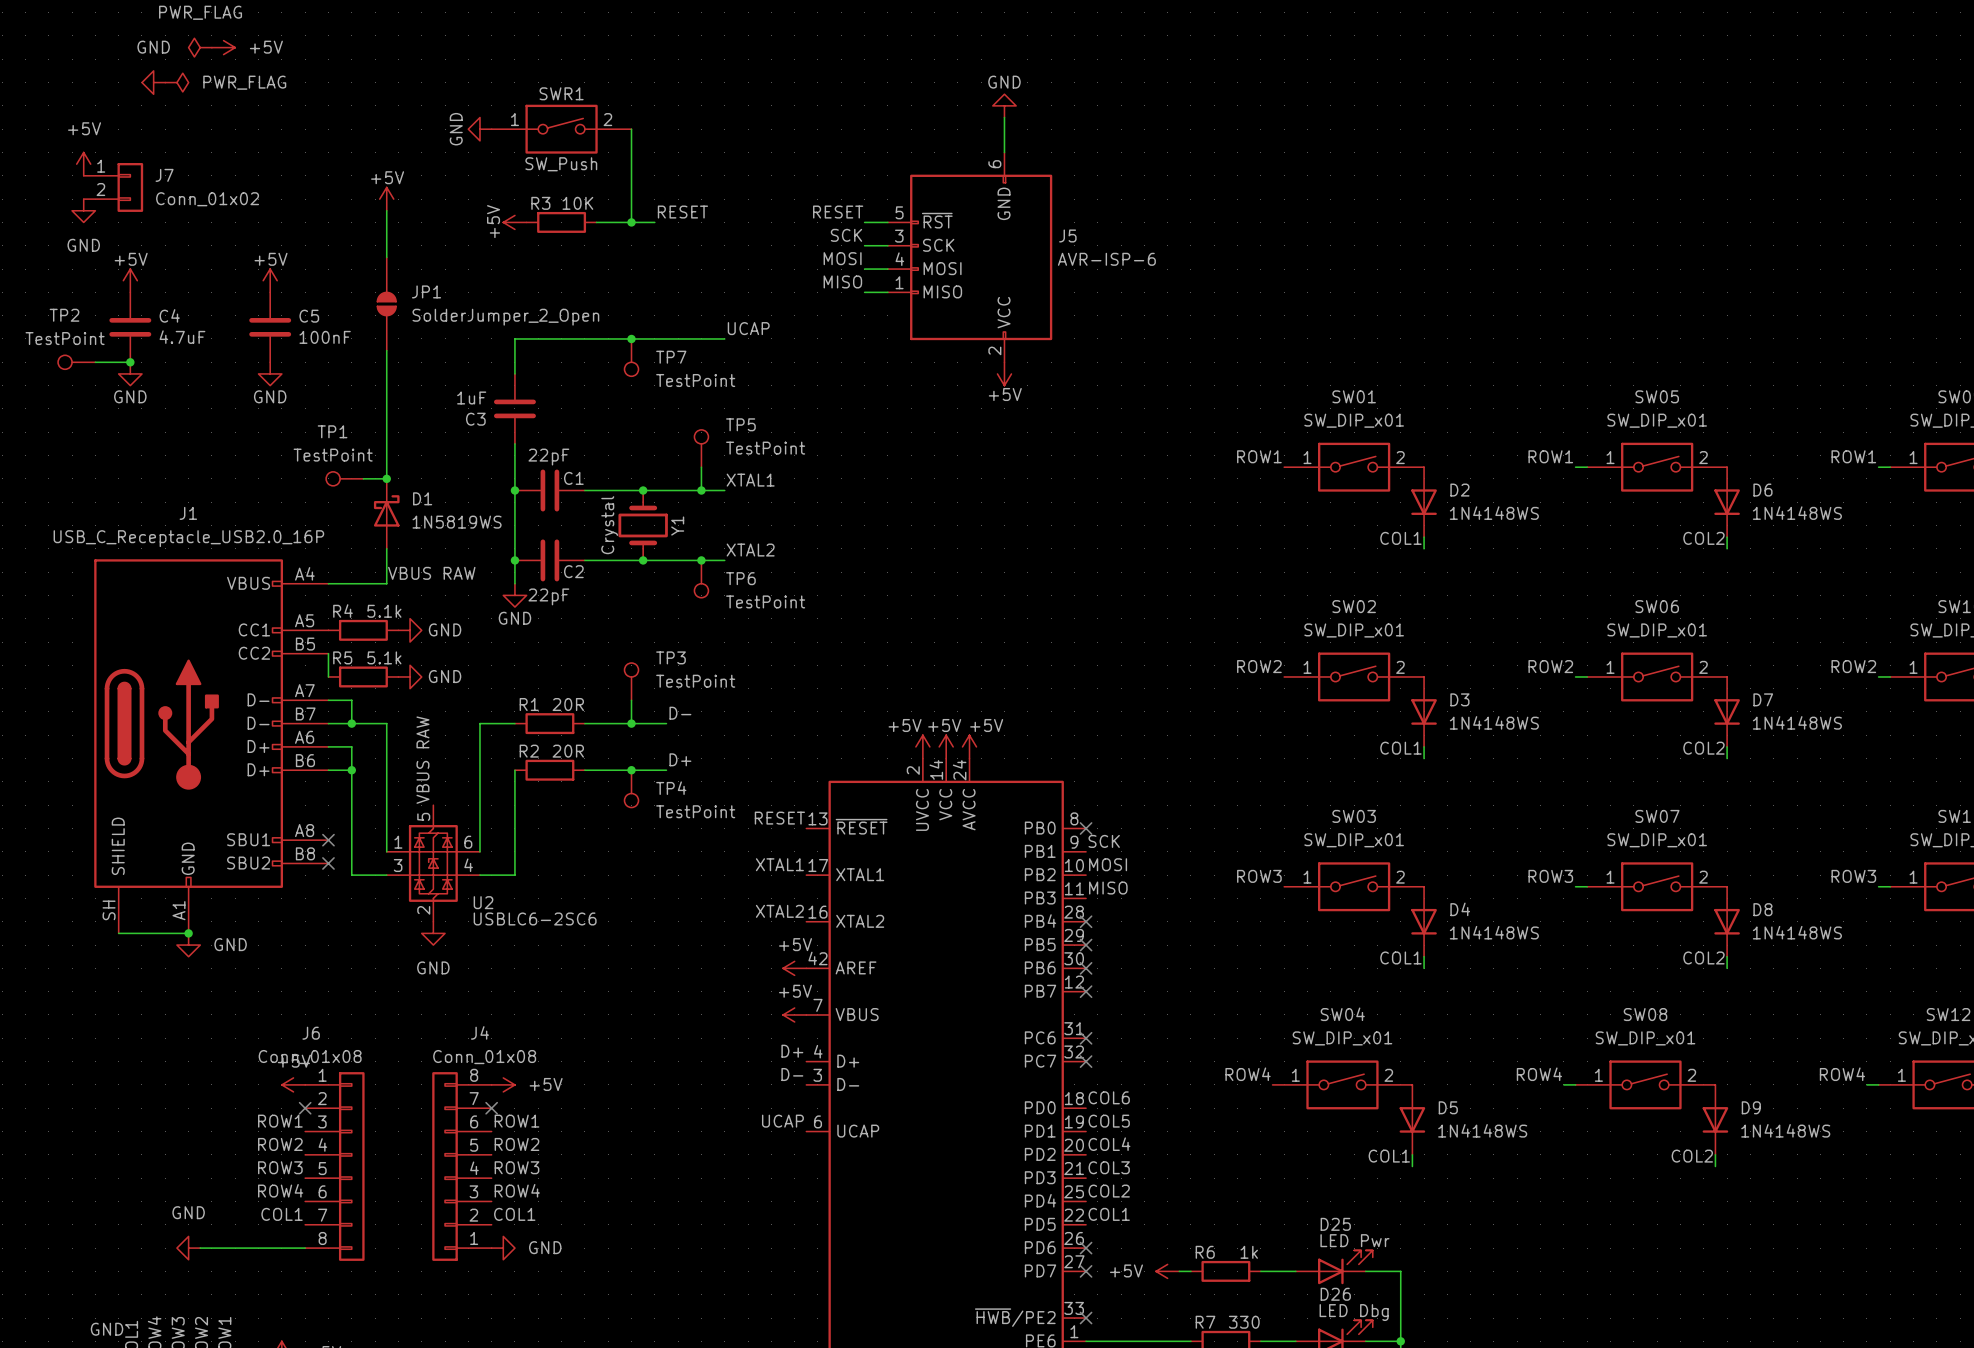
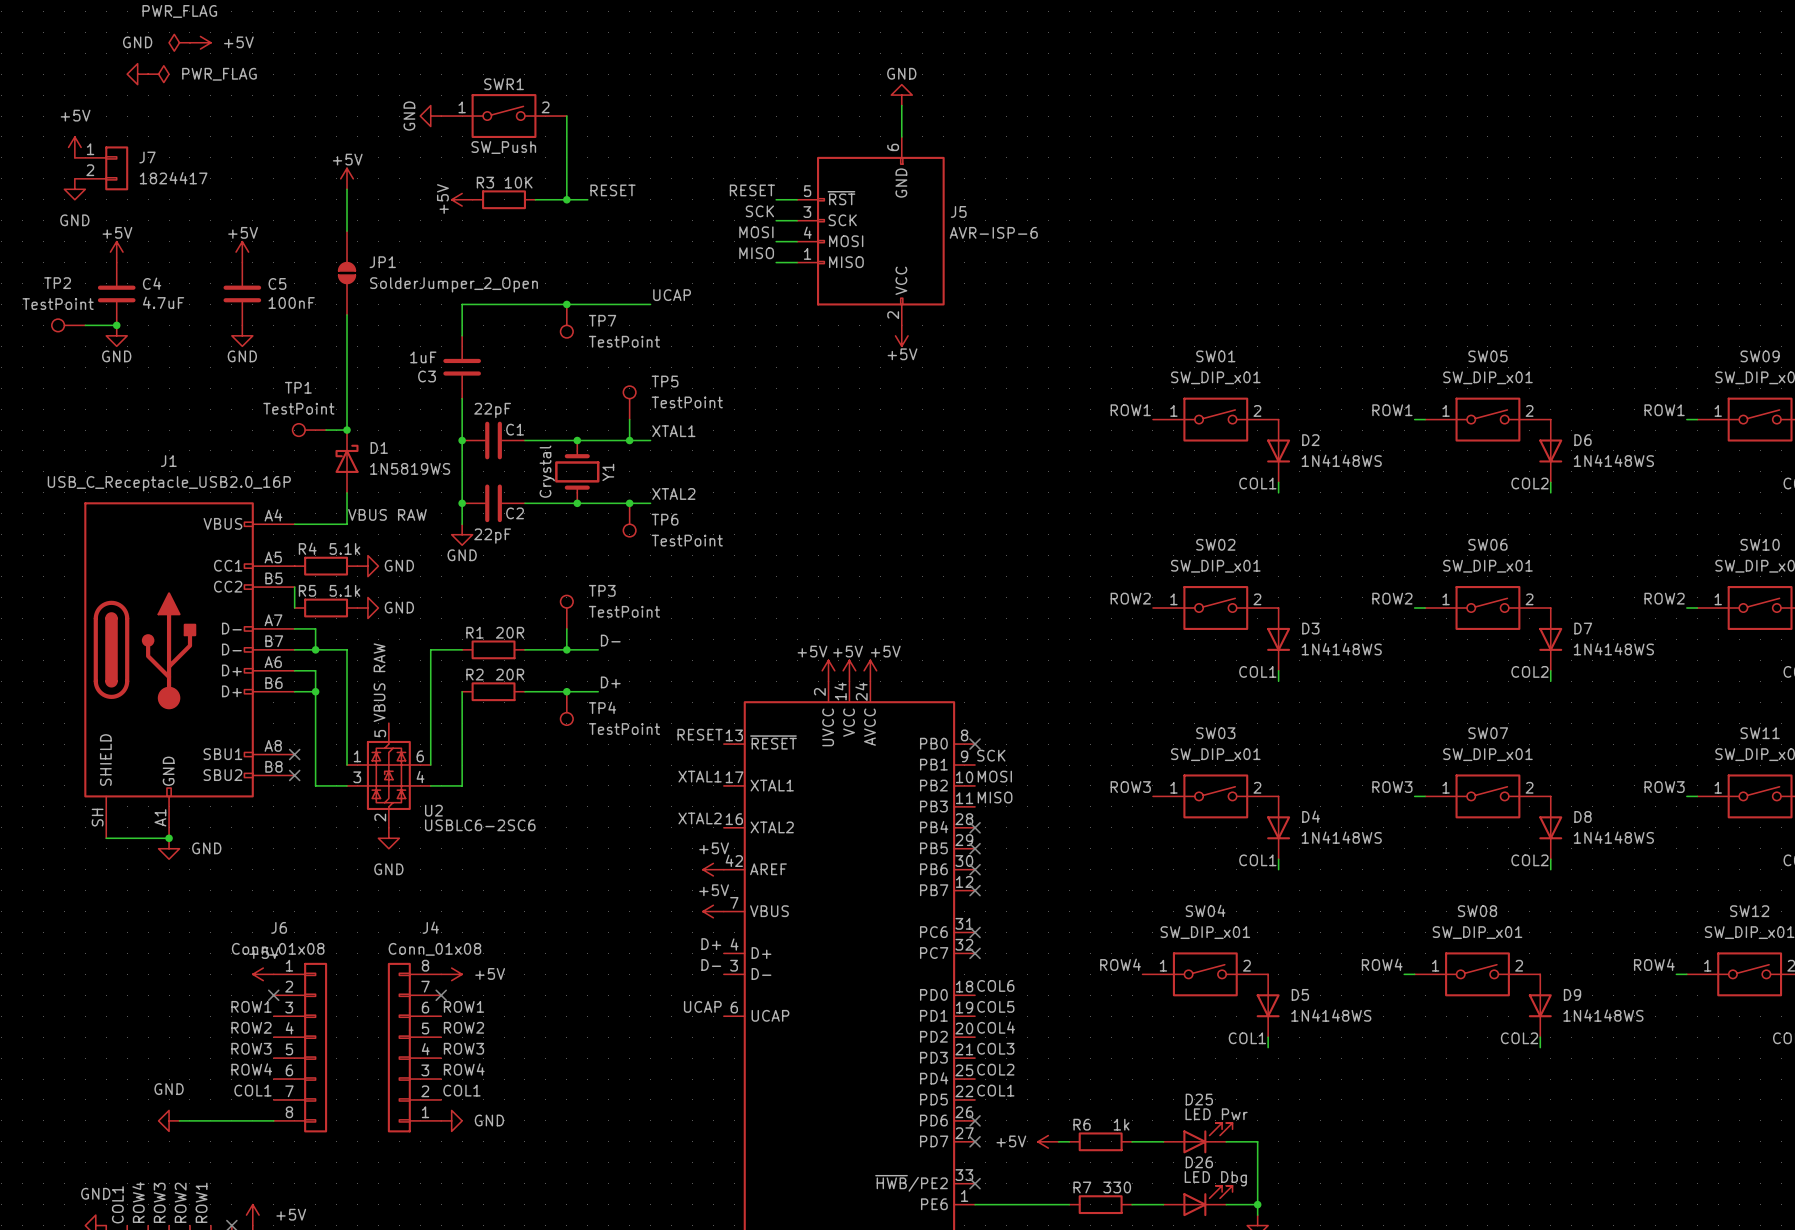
J7 value: Conn_01x02 (207, 199) -> 1824417 (173, 178)

